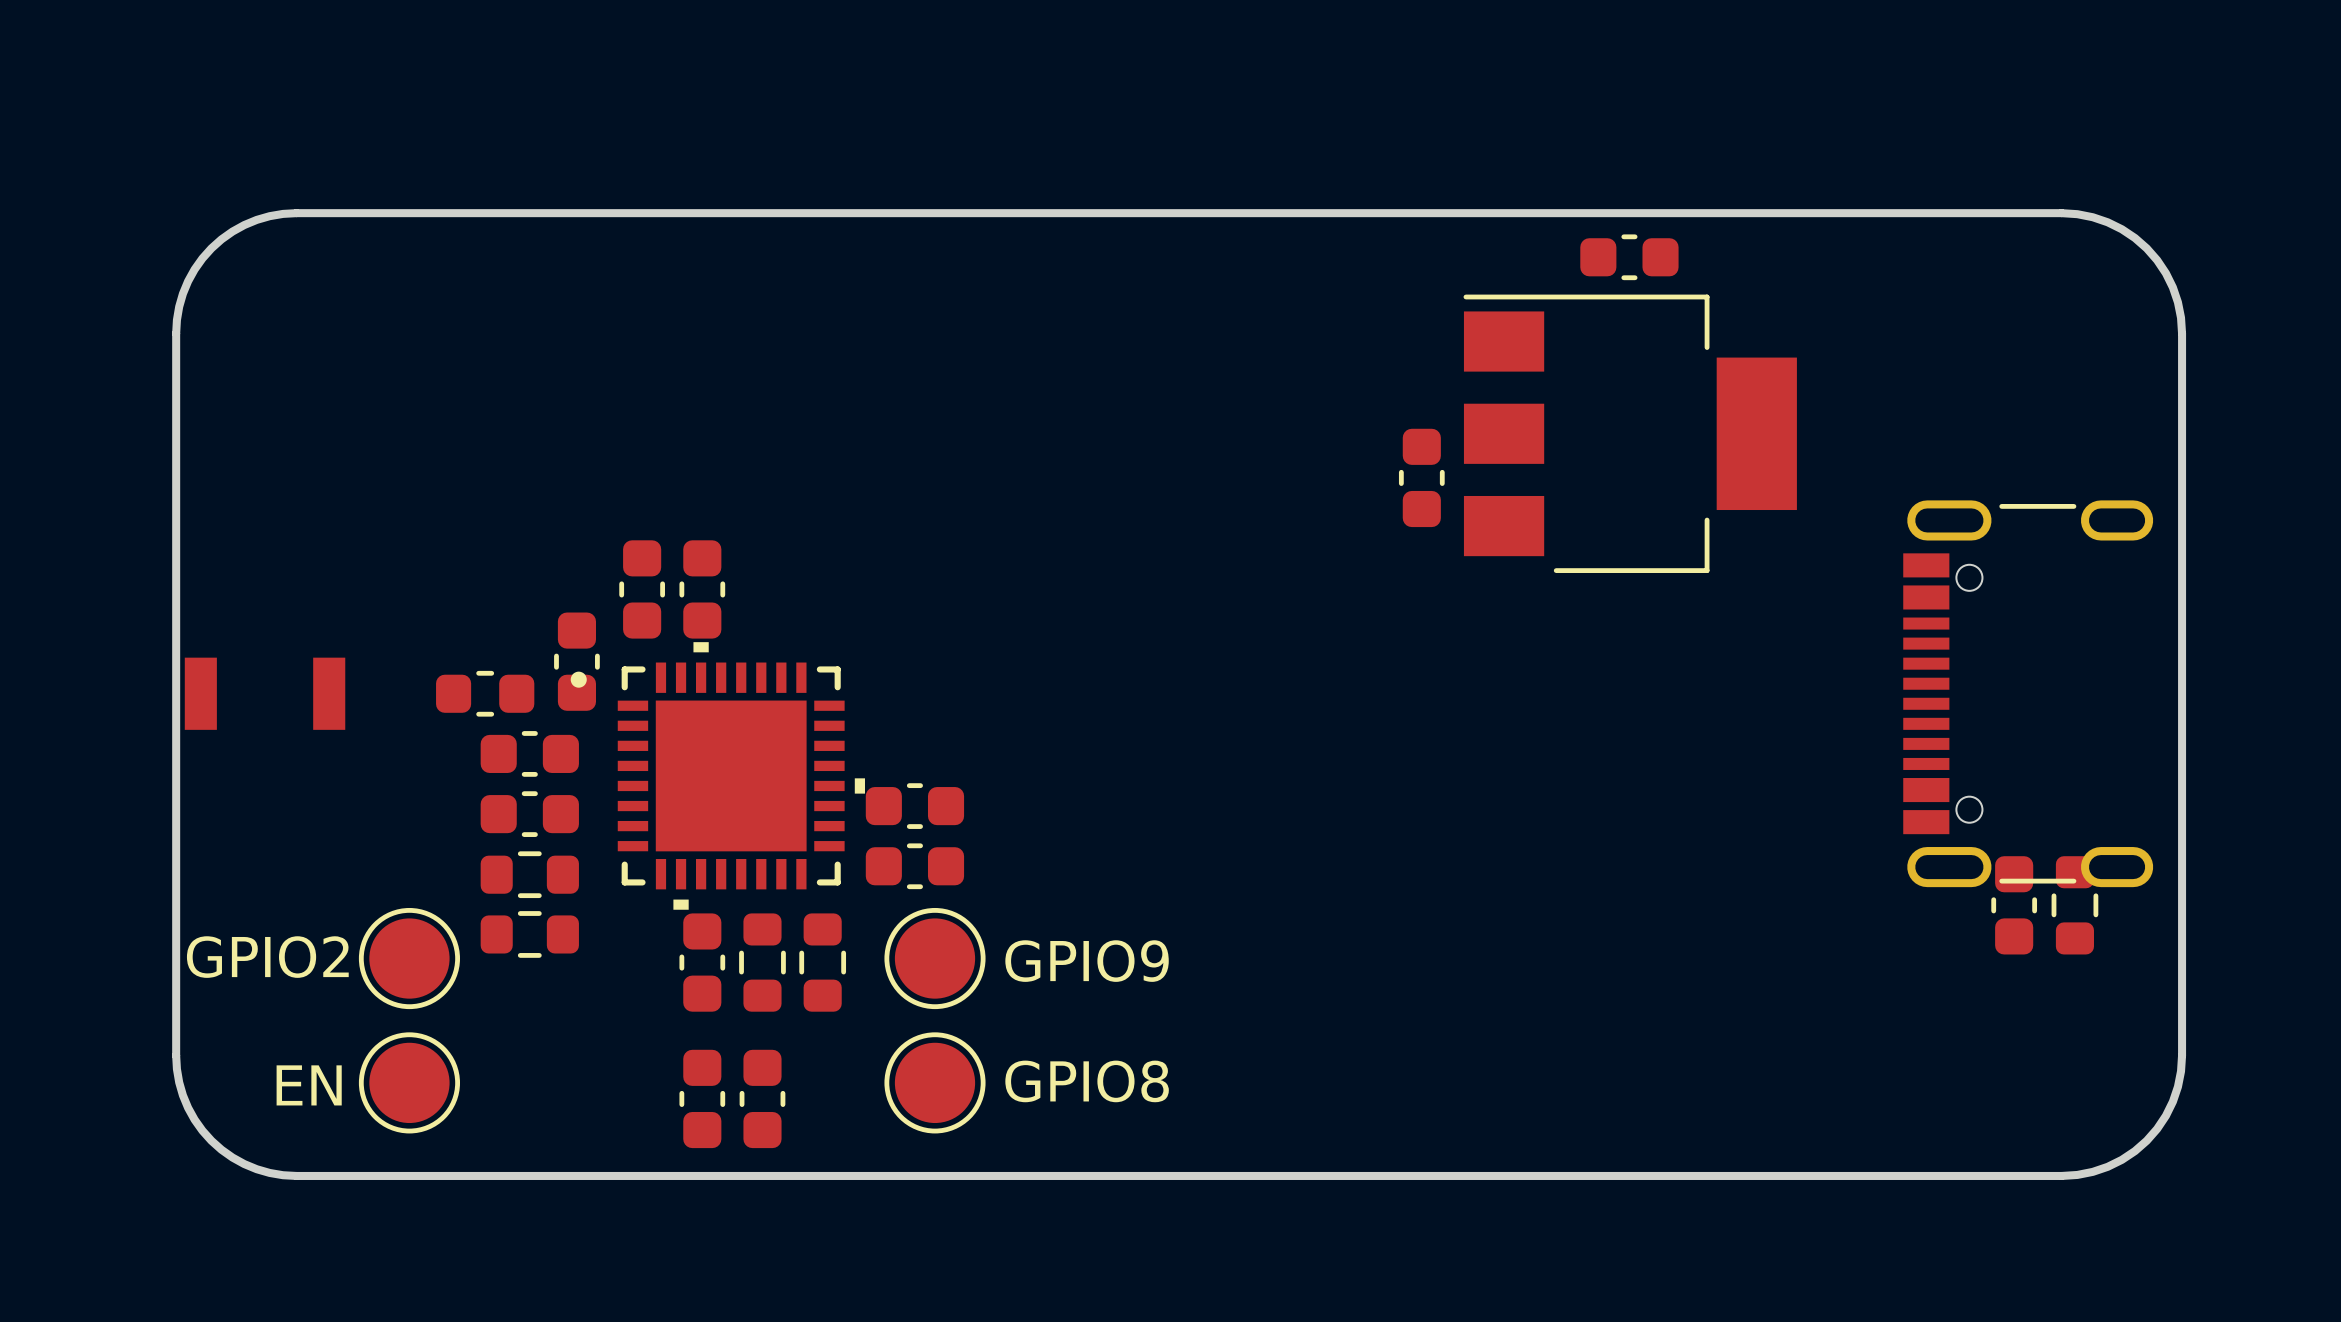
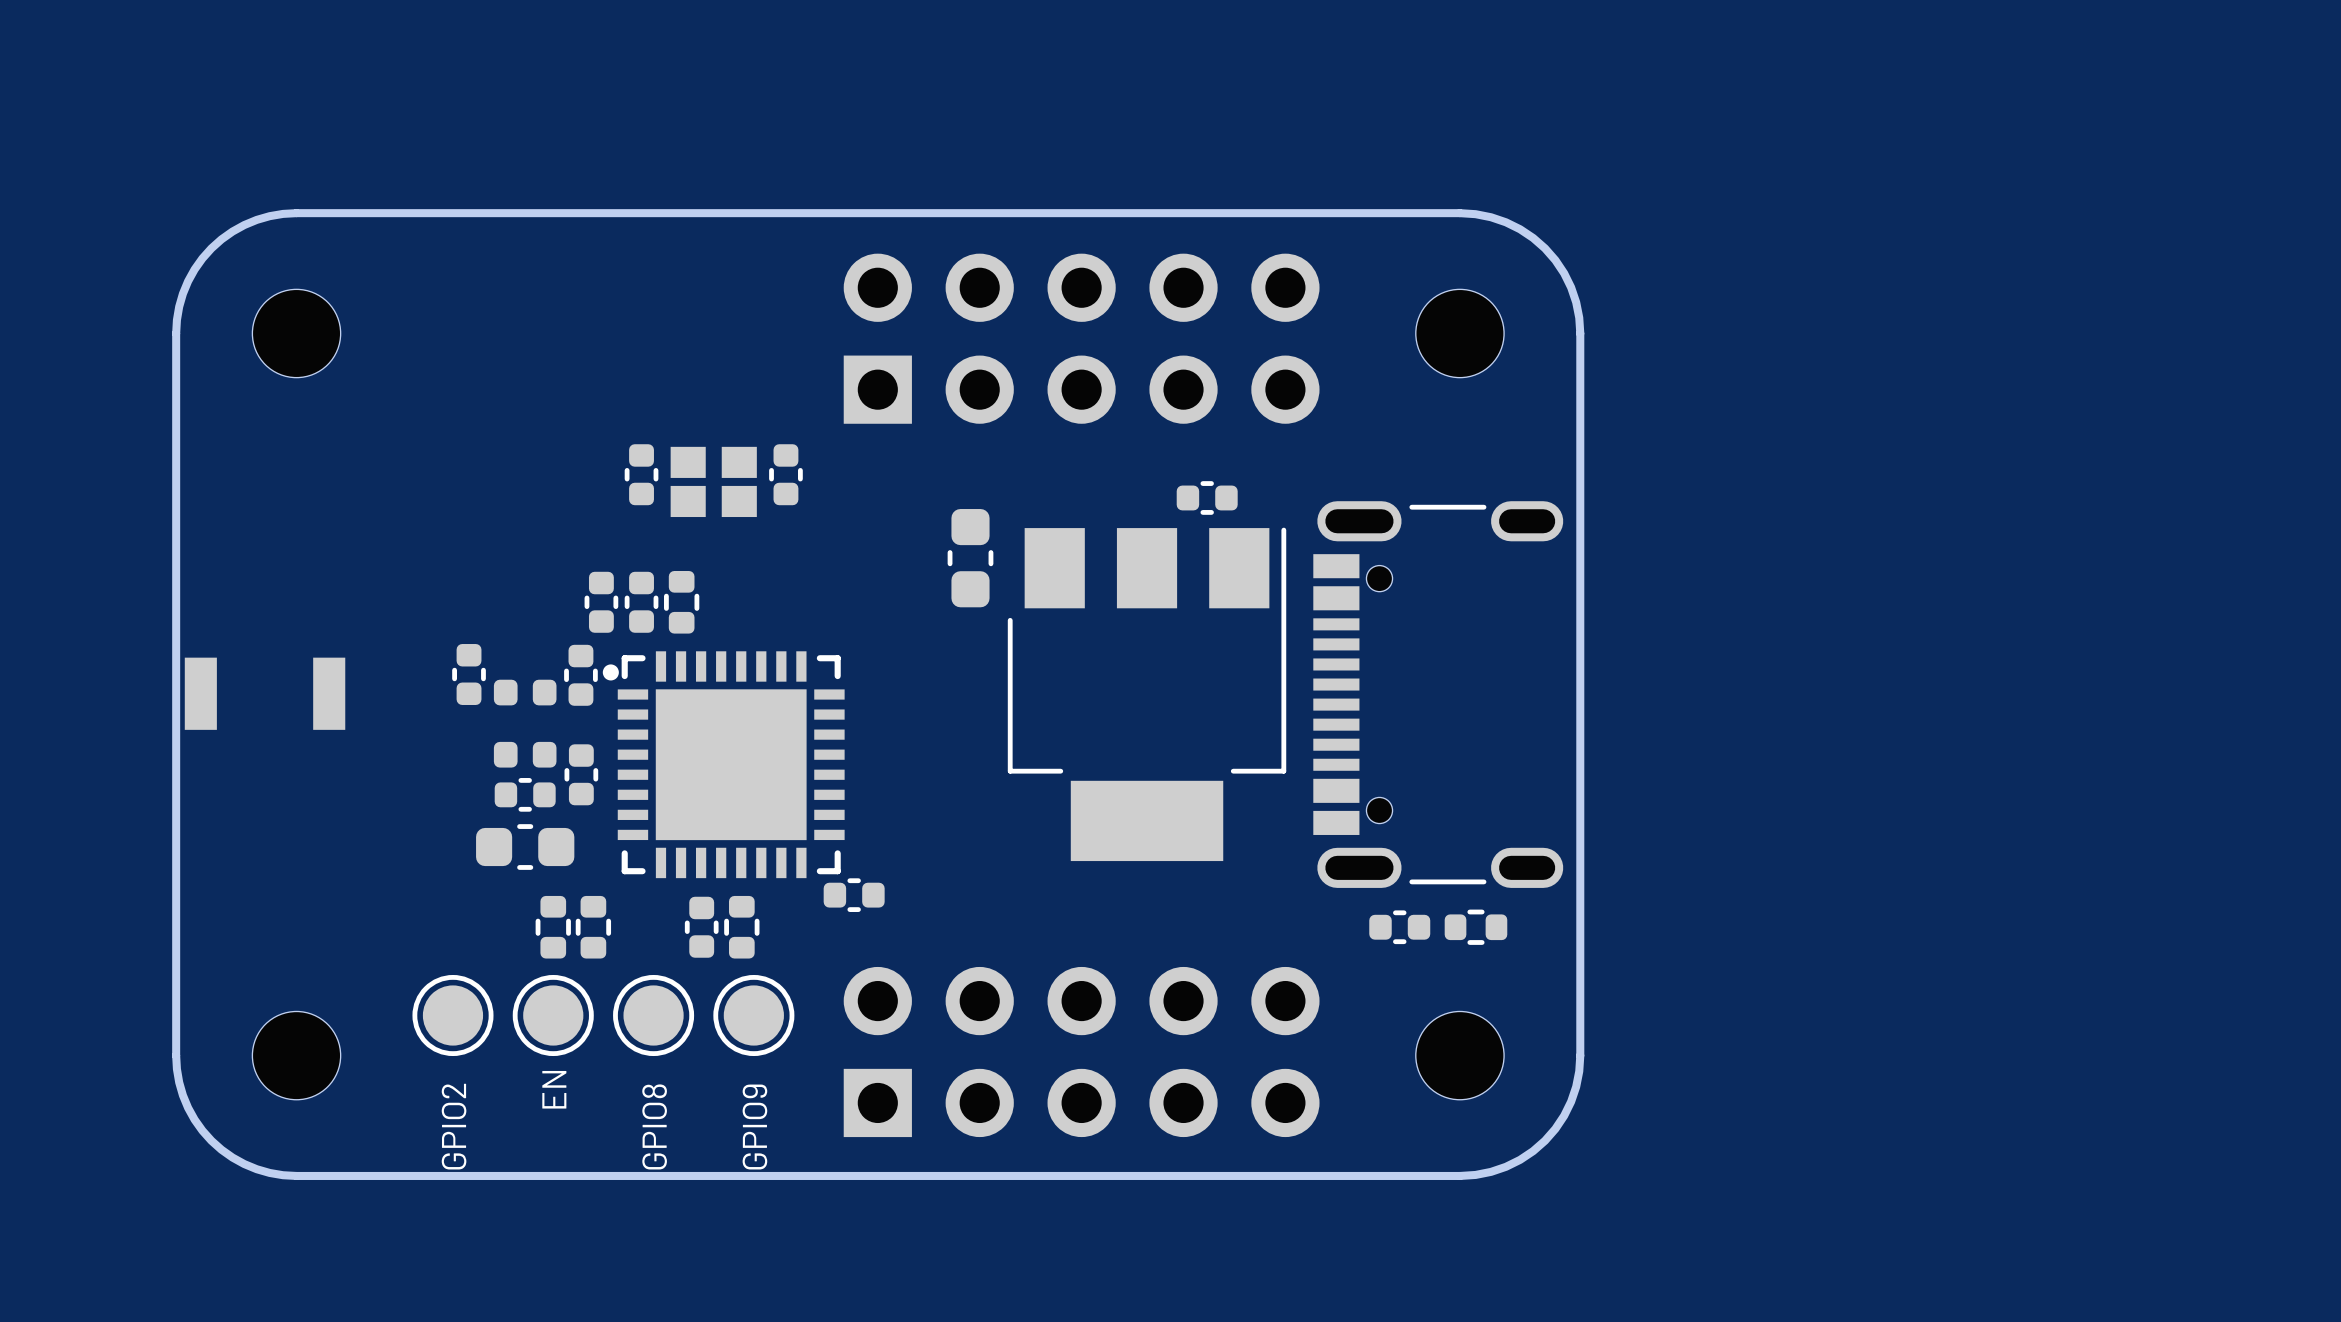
board edge: (1459, 213) (2077, 214) (2107, 222) (2121, 229) (2146, 248) (2165, 273) (2172, 287) (2177, 302) (2182, 333) (2182, 1055) (2177, 1086) (2172, 1101) (2157, 1128) (2146, 1140) (2121, 1159) (2092, 1171) (2077, 1174) (1459, 1175) -> (1459, 213) (1475, 214) (1505, 222) (1520, 229) (1545, 248) (1564, 273) (1571, 287) (1576, 302) (1580, 333) (1579, 1071) (1571, 1101) (1564, 1115) (1545, 1140) (1533, 1151) (1505, 1166) (1491, 1171) (1459, 1175)
part: (1629, 257) -> none
part: none -> (296, 333)
part: none -> (1459, 333)
part: none -> (1081, 338)
part rotation: 0° (1630, 433) -> 90° clockwise (1147, 694)
part position: (1630, 433) -> (1147, 694)
part: none -> (641, 474)
part: none -> (785, 474)
part: (1421, 477) -> none
part: none -> (713, 481)
part: none -> (1207, 497)
part footprint: [619, 540, 666, 639] -> [624, 571, 659, 633]
part: none -> (970, 558)
part: (702, 589) -> none
part: none -> (601, 602)
part: none -> (681, 602)
part footprint: [554, 612, 600, 711] -> [564, 644, 598, 706]
part footprint: [570, 642, 865, 910] -> [602, 651, 845, 879]
part: none -> (469, 674)
part: none -> (525, 692)
part: (485, 693) -> none
part position: (2028, 693) -> (1438, 694)
part footprint: [480, 731, 579, 777] -> [493, 741, 557, 768]
part: none -> (581, 774)
part: none -> (525, 794)
part: (914, 806) -> none
part position: (529, 814) -> (525, 847)
part: (914, 866) -> none
part: (529, 874) -> none
part: none -> (854, 895)
part: (2014, 905) -> none
part: (2074, 905) -> none
part footprint: [480, 911, 579, 958] -> [535, 895, 571, 959]
part: none -> (593, 927)
part: none -> (701, 927)
part: none -> (741, 927)
part: none -> (1399, 927)
part: none -> (1475, 927)
part: GPIO2 (409, 958) -> none
part: GPIO9 (934, 958) -> none
part: (702, 962) -> none
part: (762, 962) -> none
part: (822, 962) -> none
part: none -> (452, 1015)
part: none -> (553, 1015)
part: none -> (653, 1015)
part: none -> (753, 1015)
part: none -> (1081, 1052)
part: none -> (296, 1055)
part: none -> (1459, 1055)
part: EN (409, 1082) -> none
part: GPIO8 (934, 1082) -> none
text: none -> EN (554, 1089)
part: (702, 1098) -> none
part: (762, 1098) -> none
text: none -> GPIO2 (454, 1126)
text: none -> GPIO8 (654, 1126)
text: none -> GPIO9 (754, 1127)

